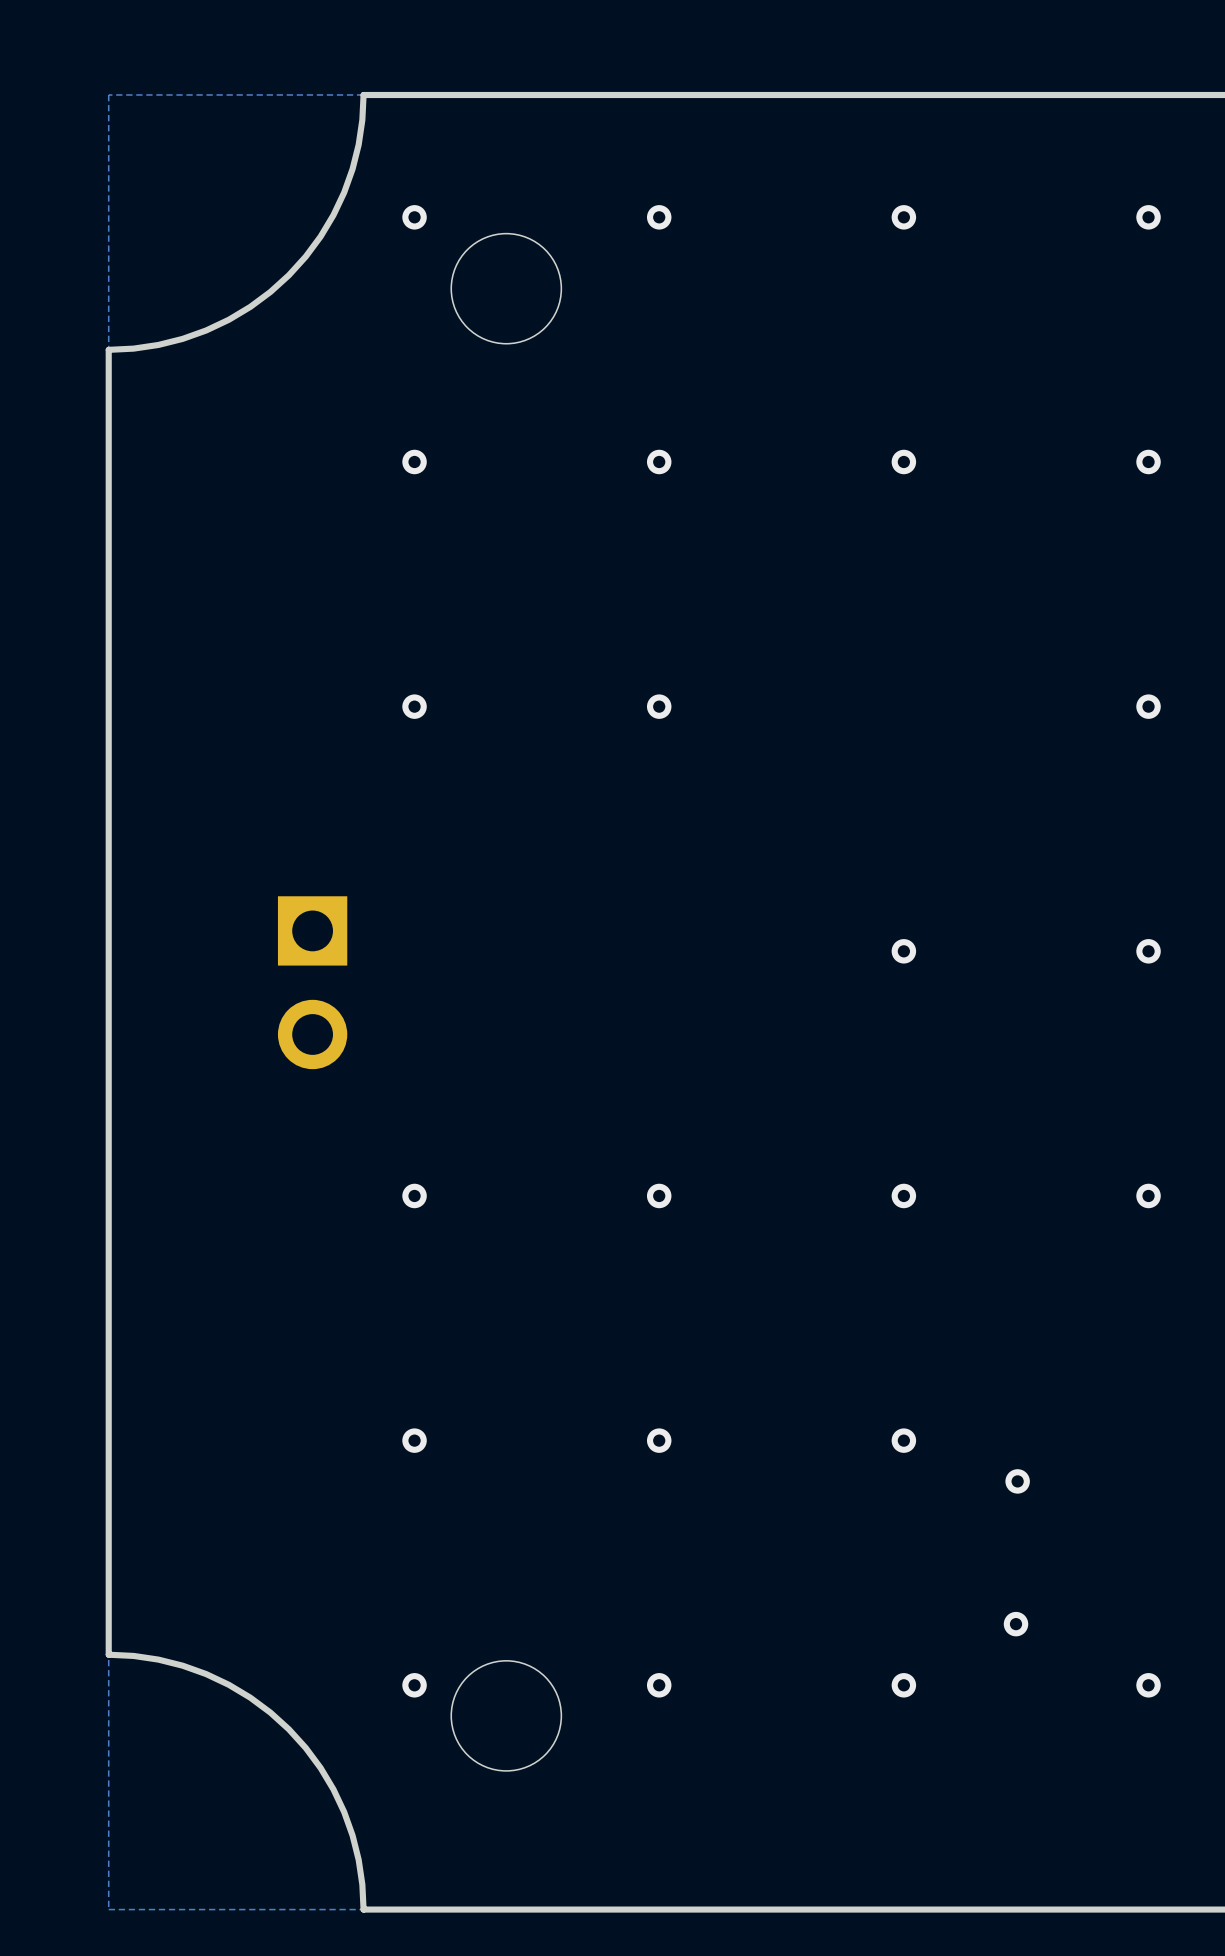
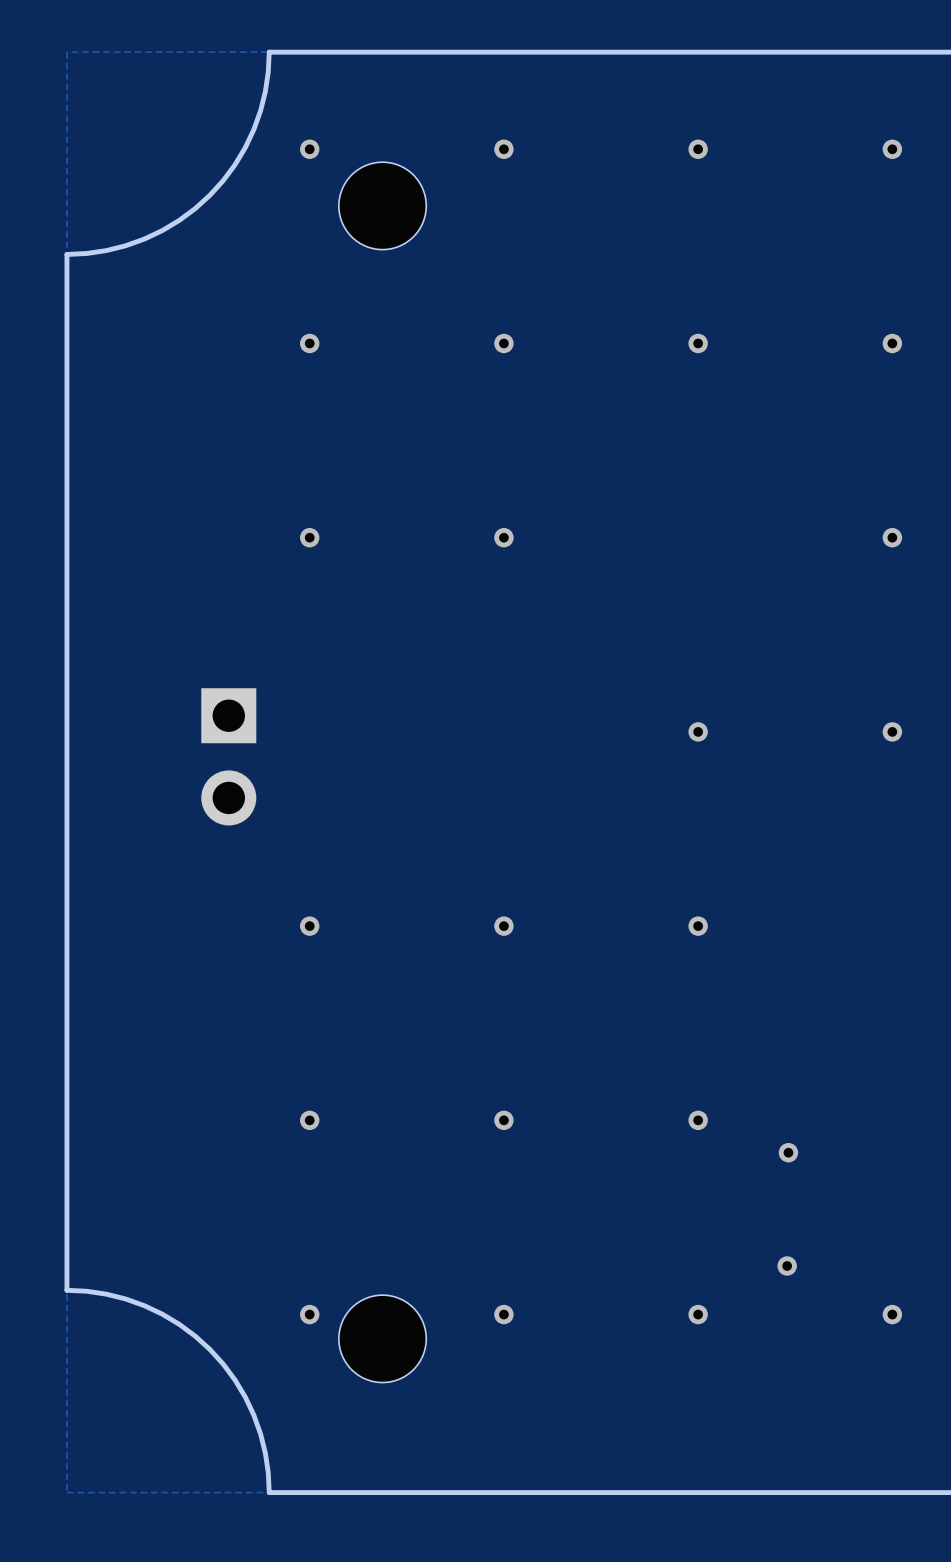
via: (1148, 1195) -> none

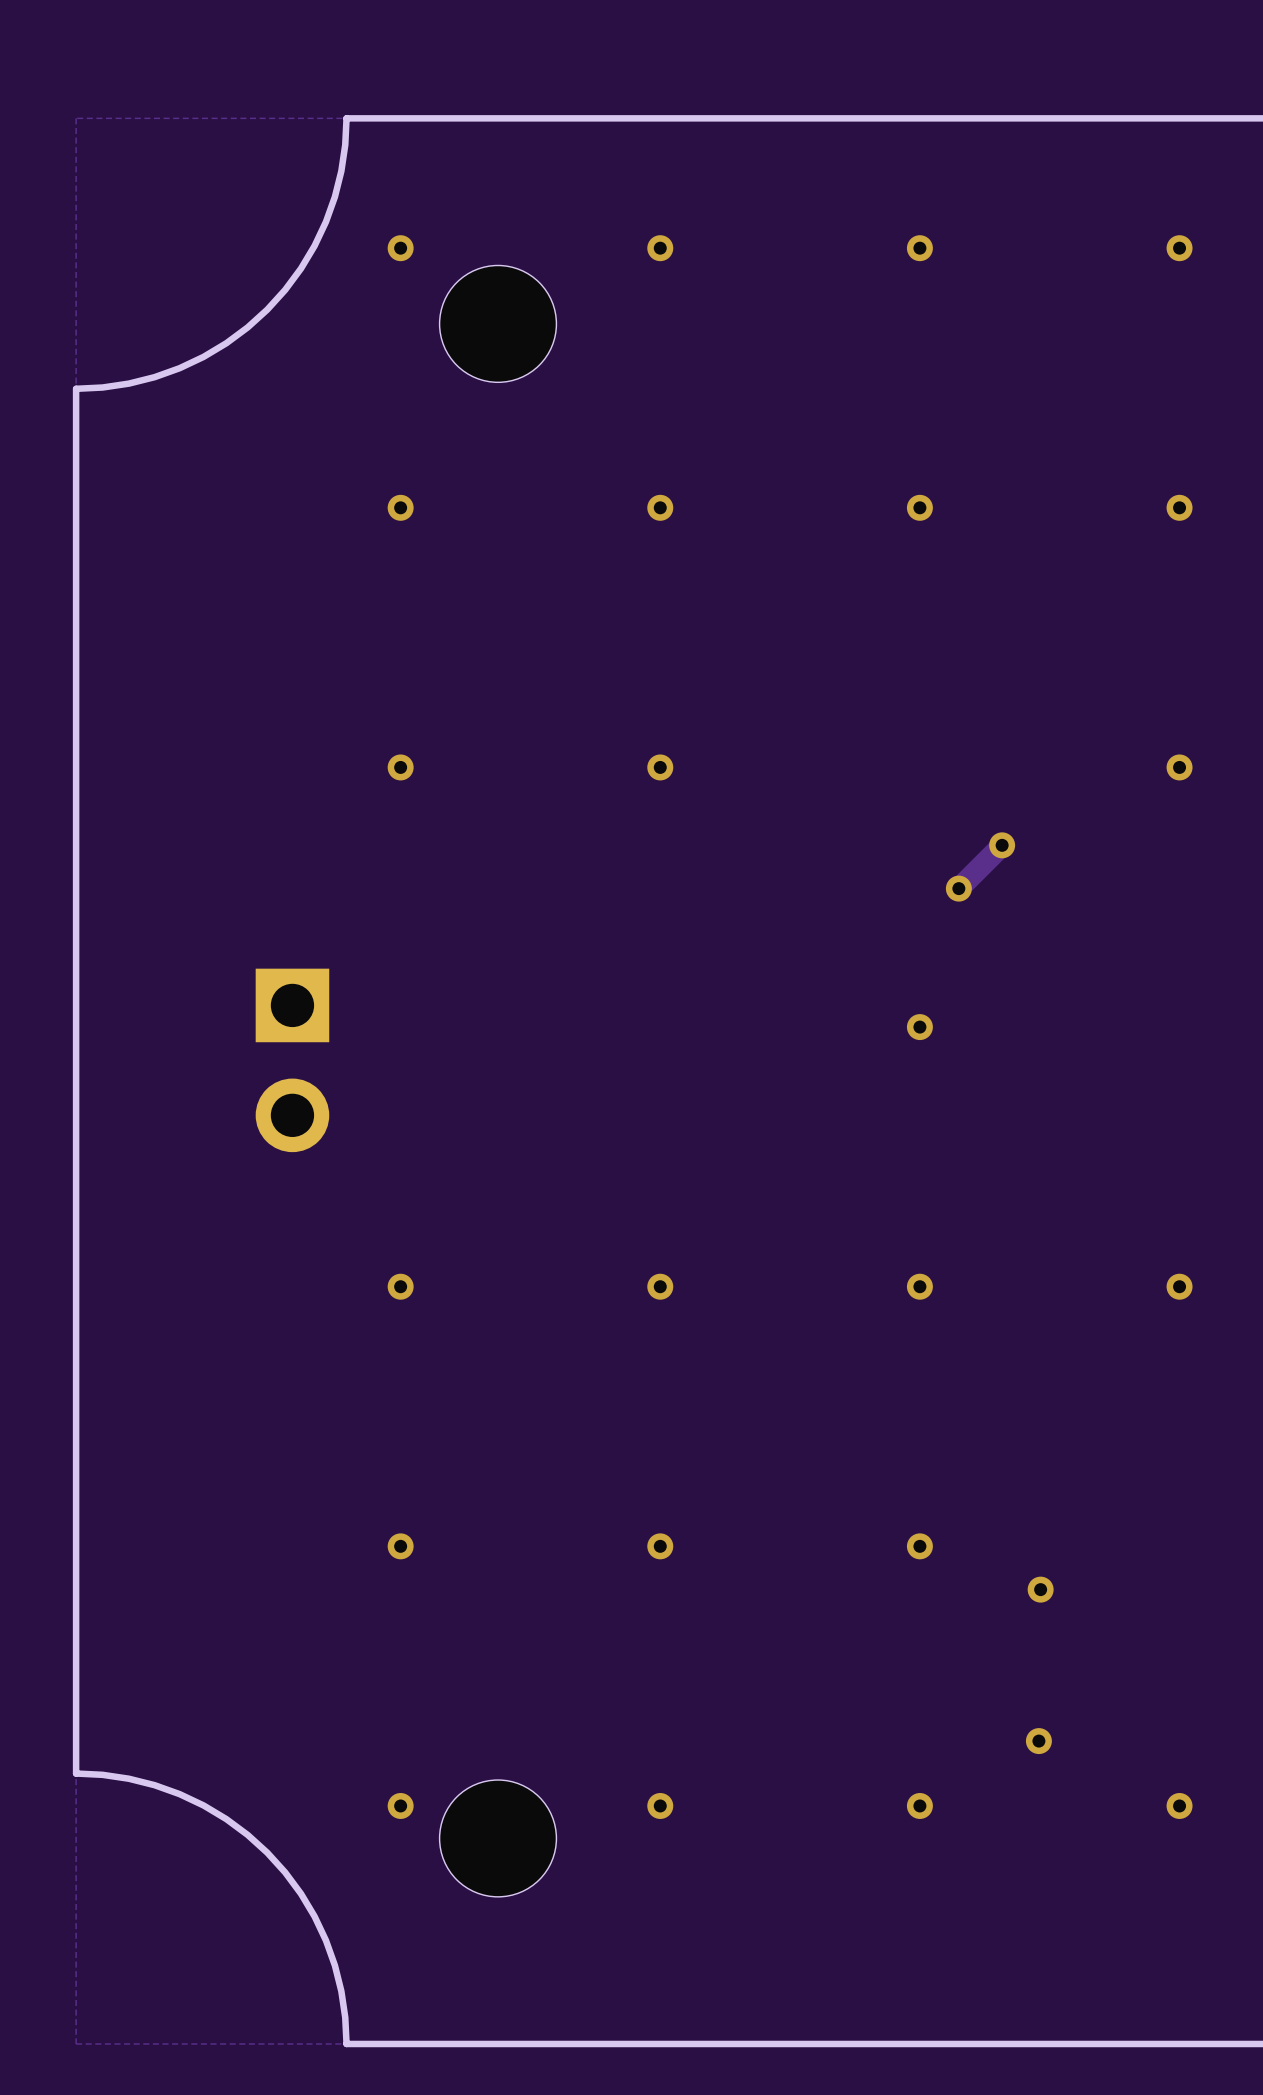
track: none -> (1002, 845) (958, 888)
via: none -> (1002, 845)
via: none -> (958, 888)
via: (892, 731) -> none
via: none -> (1179, 1286)

